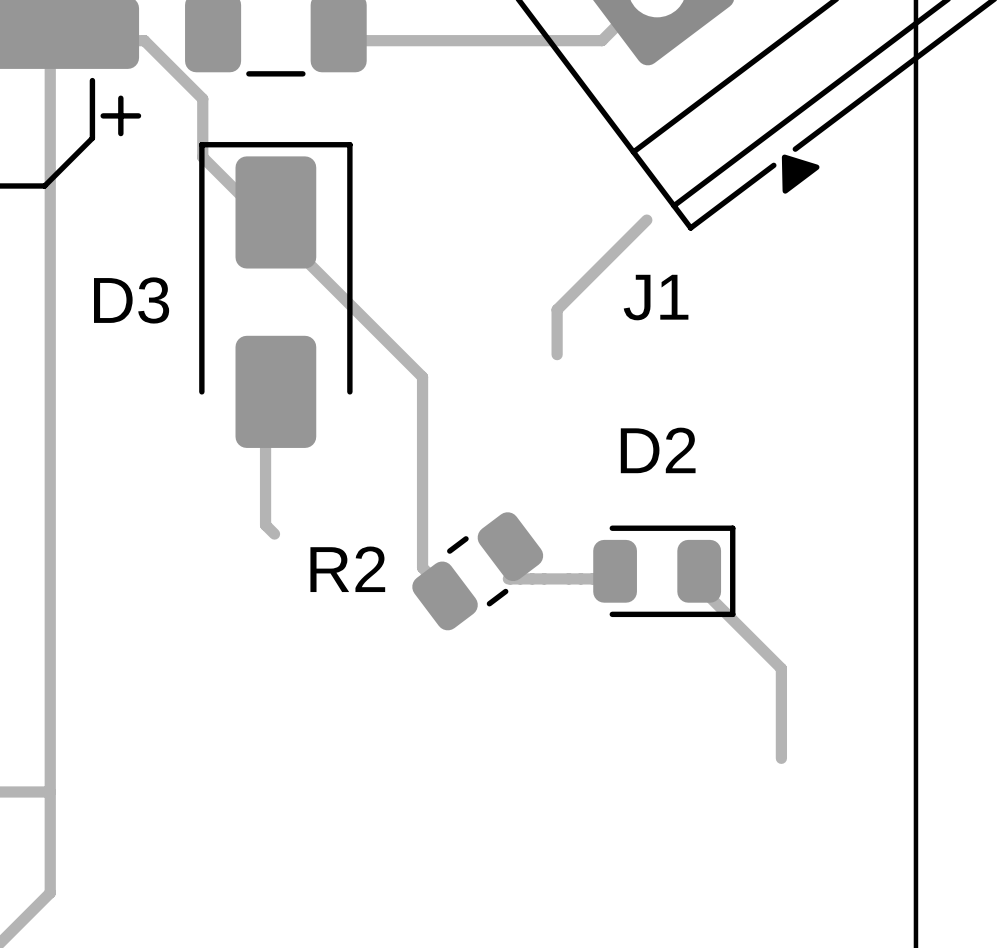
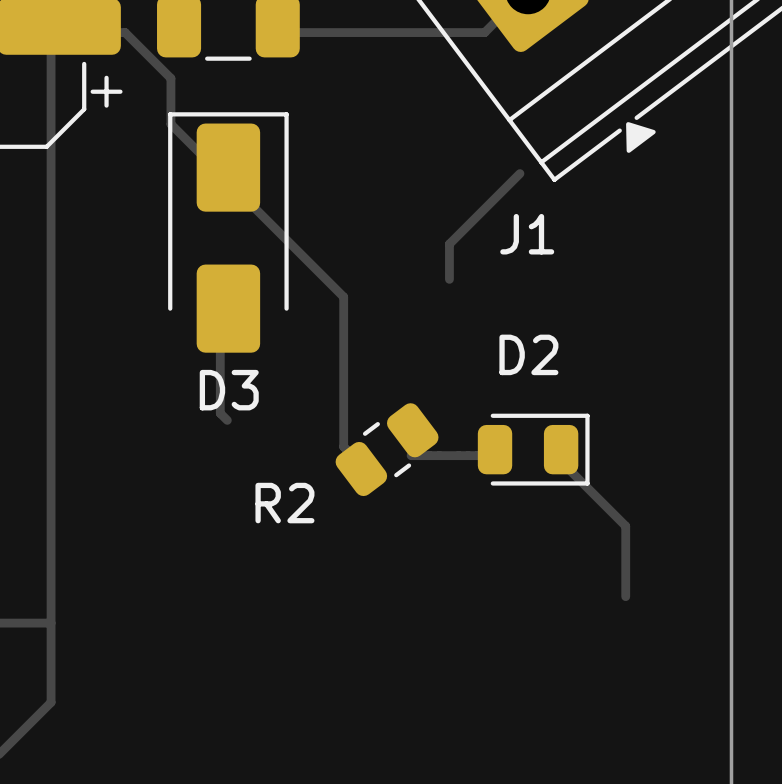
D3 name position: D3 (131, 300) -> D3 (229, 390)
R2 name position: R2 (347, 569) -> R2 (284, 503)

